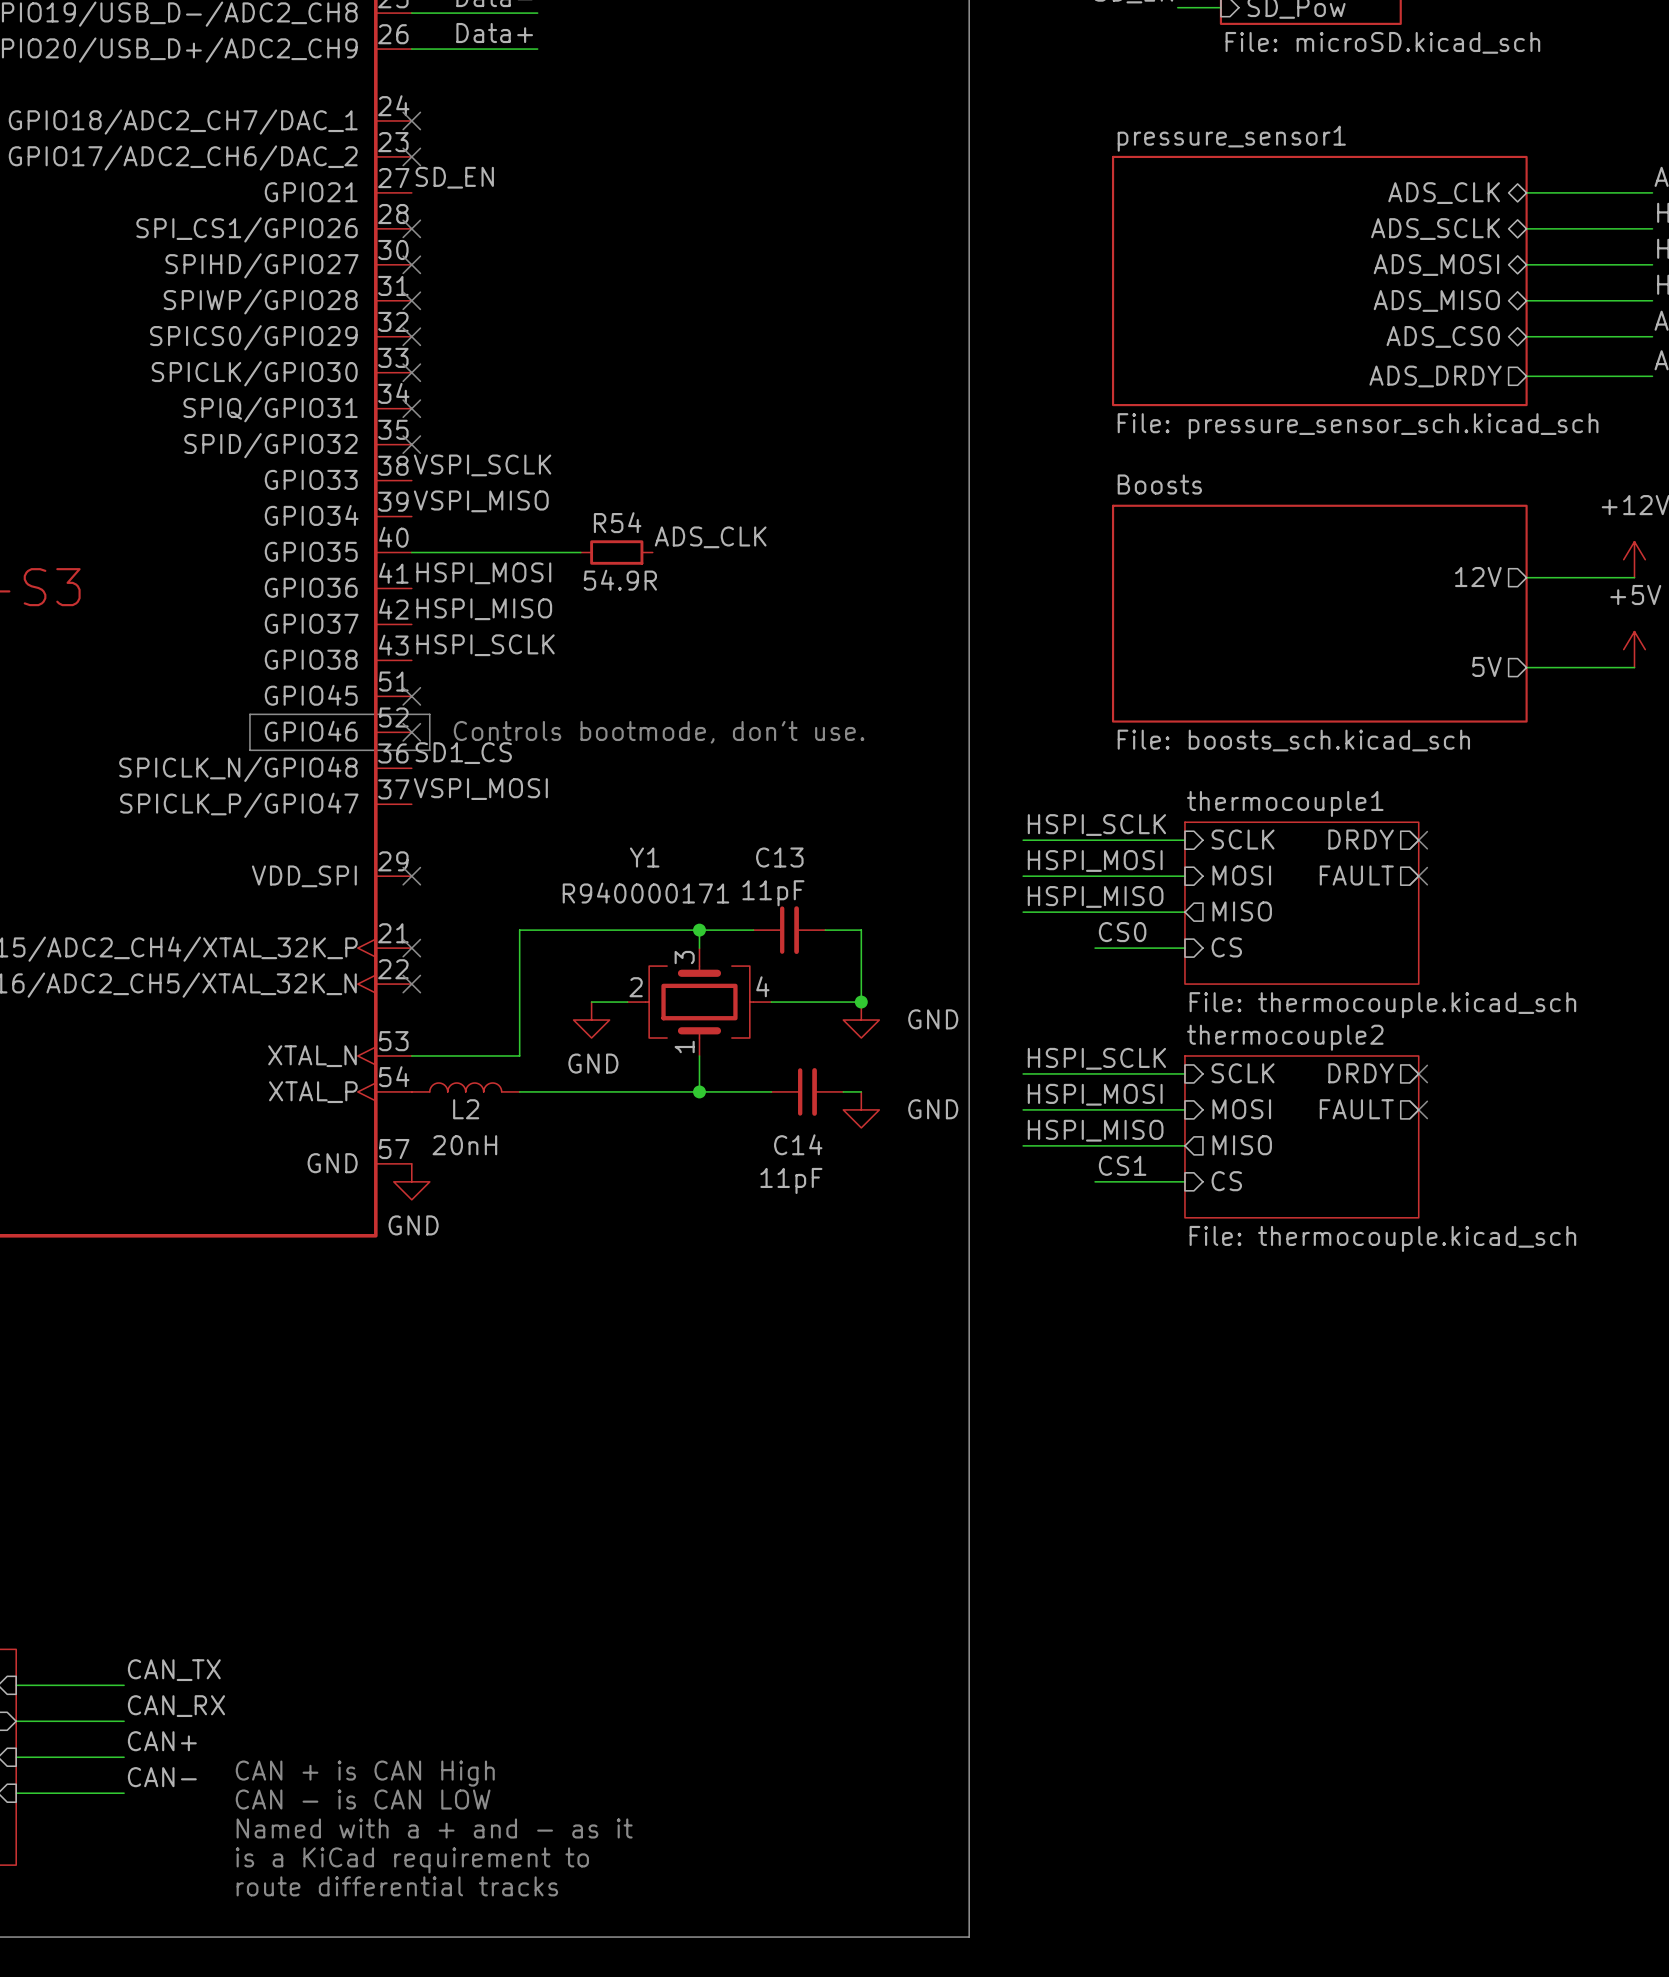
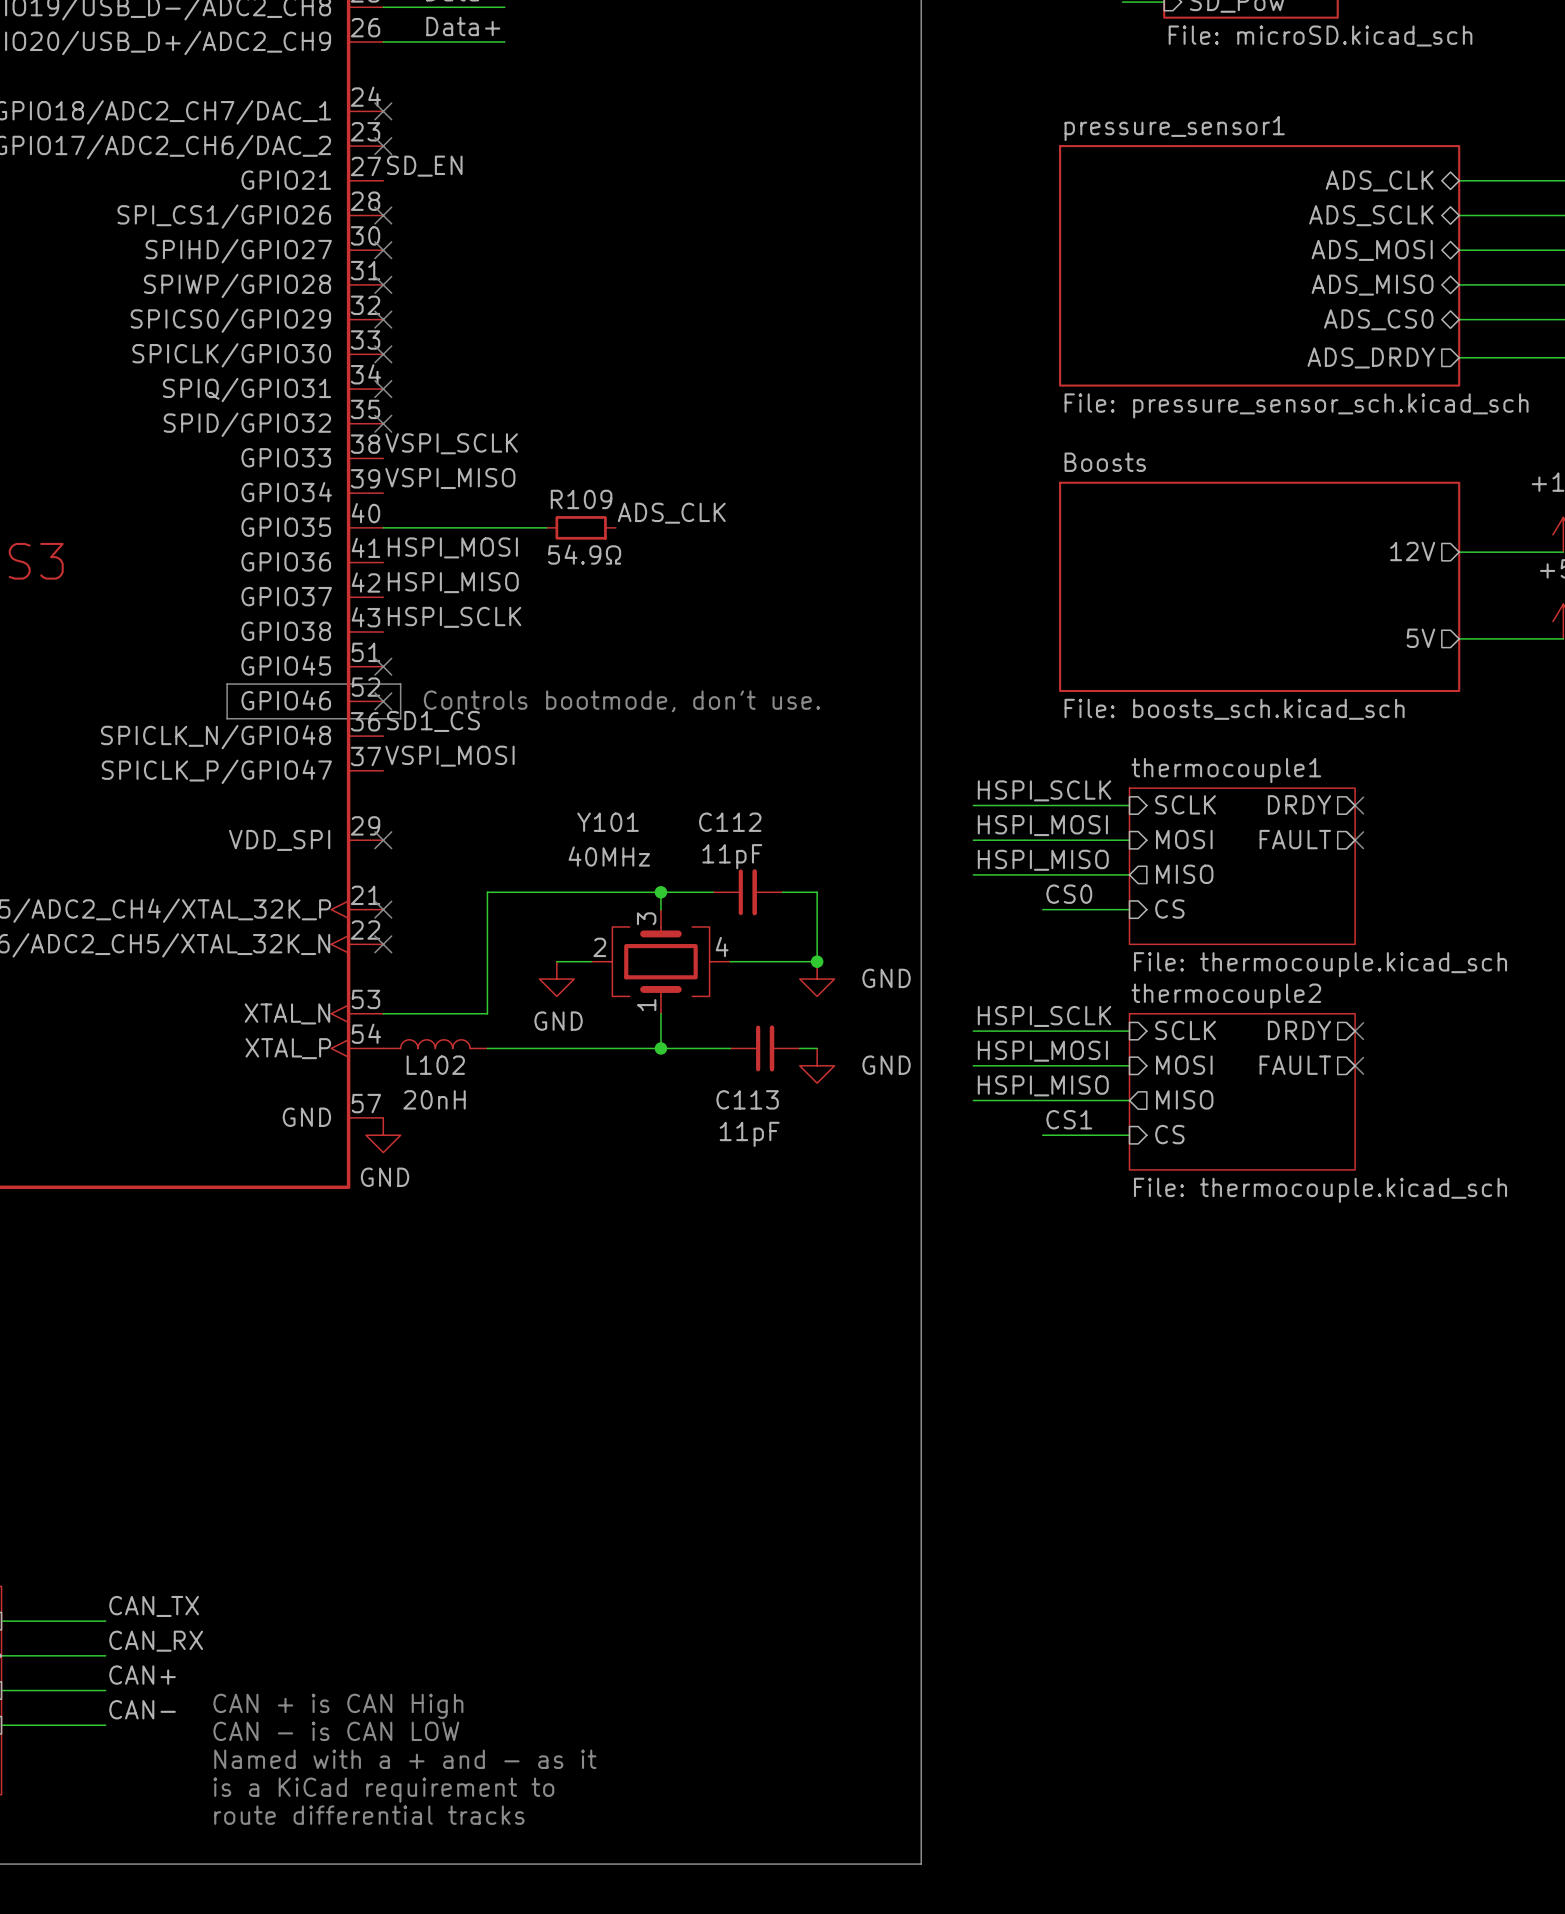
R54 name: R54 (617, 522) -> R109 (581, 499)
R54 value: 54.9R (620, 580) -> 54.9Ω (584, 554)
Y1 name: Y1 (644, 857) -> Y101 (608, 822)
C13 name: C13 (779, 857) -> C112 (730, 822)
Y1 value: R940000171 (645, 893) -> 40MHz (609, 856)
L2 name: L2 (466, 1109) -> L102 (435, 1065)
C14 name: C14 (798, 1144) -> C113 (747, 1099)

